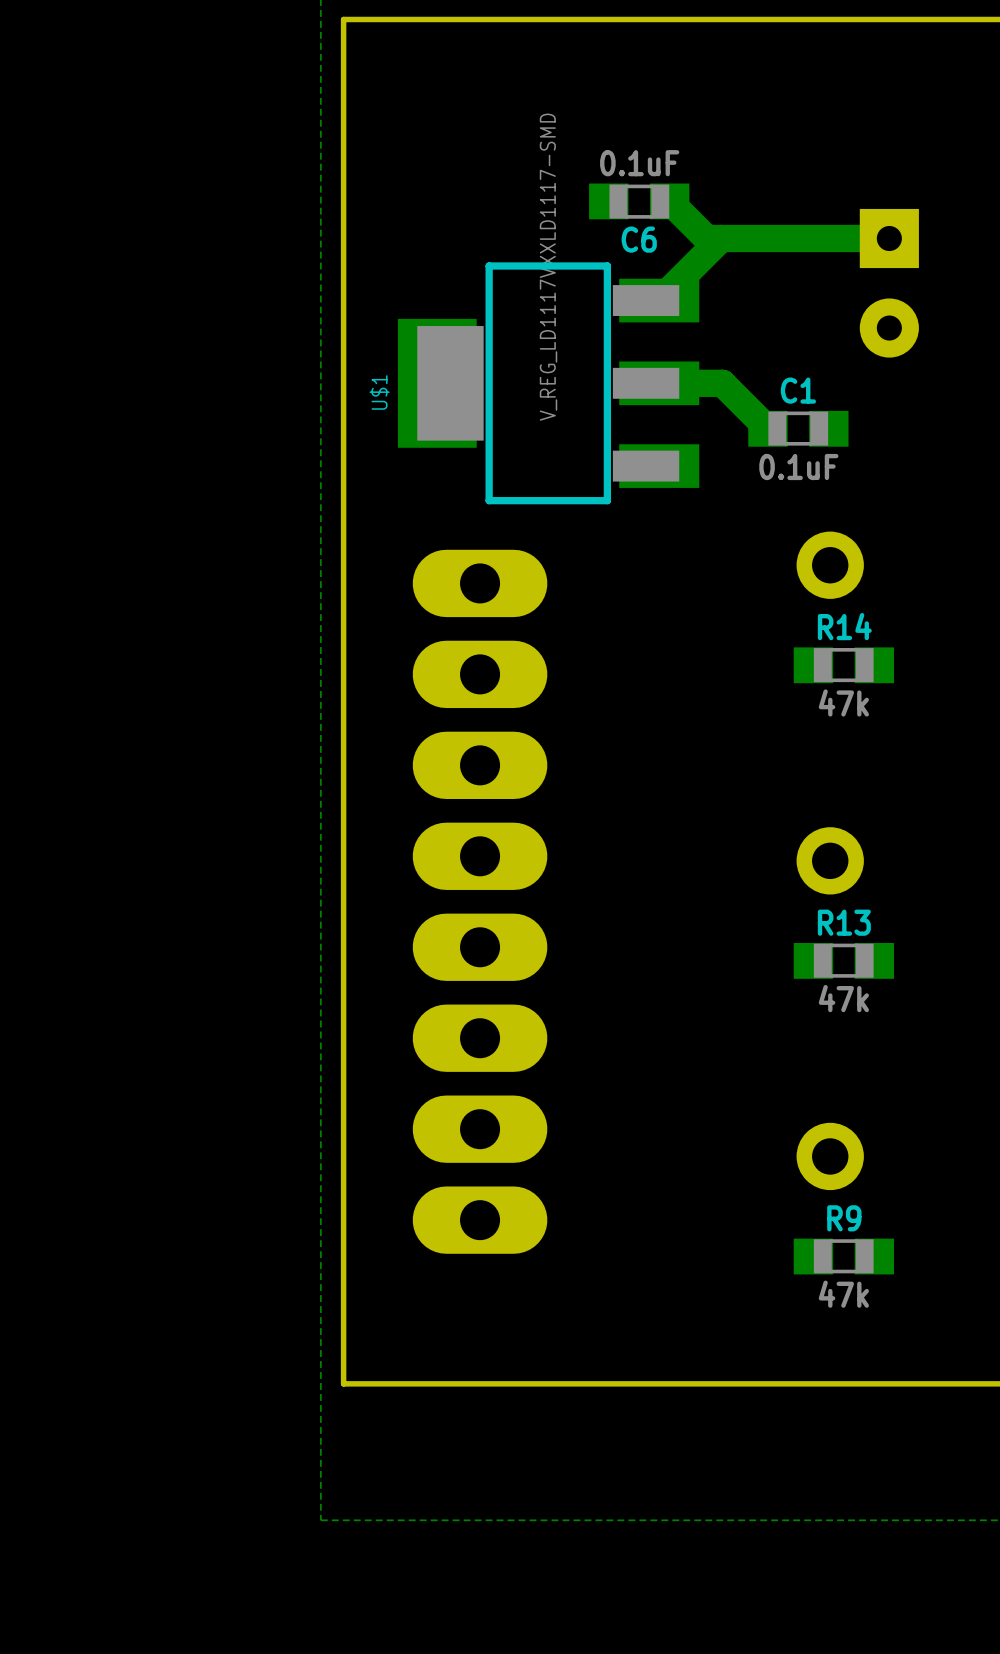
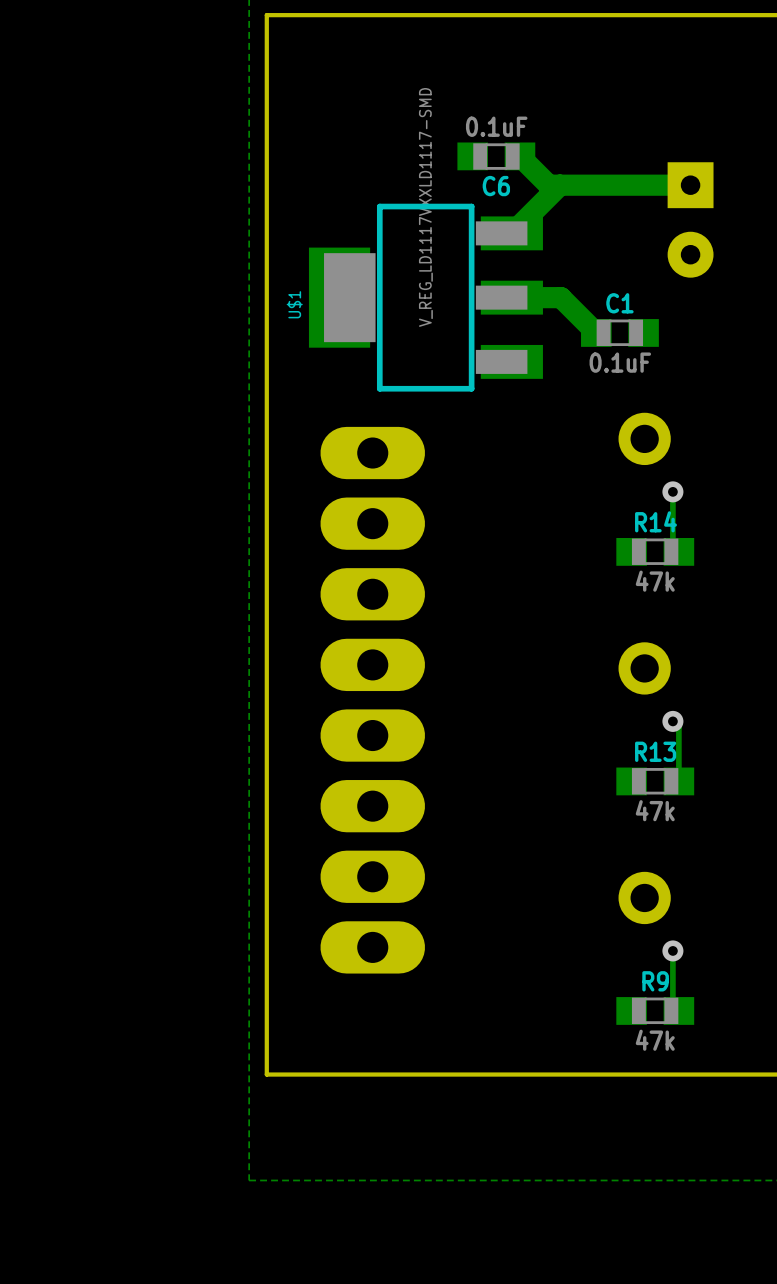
track: none -> (672, 491) (672, 545) (678, 551)
via: none -> (672, 491)
R14 position: (843, 665) -> (655, 551)
track: none -> (672, 721) (678, 727) (678, 781)
via: none -> (672, 721)
R13 position: (843, 960) -> (655, 781)
track: none -> (672, 950) (672, 1005) (678, 1010)
via: none -> (672, 950)
R9 position: (843, 1256) -> (655, 1010)

